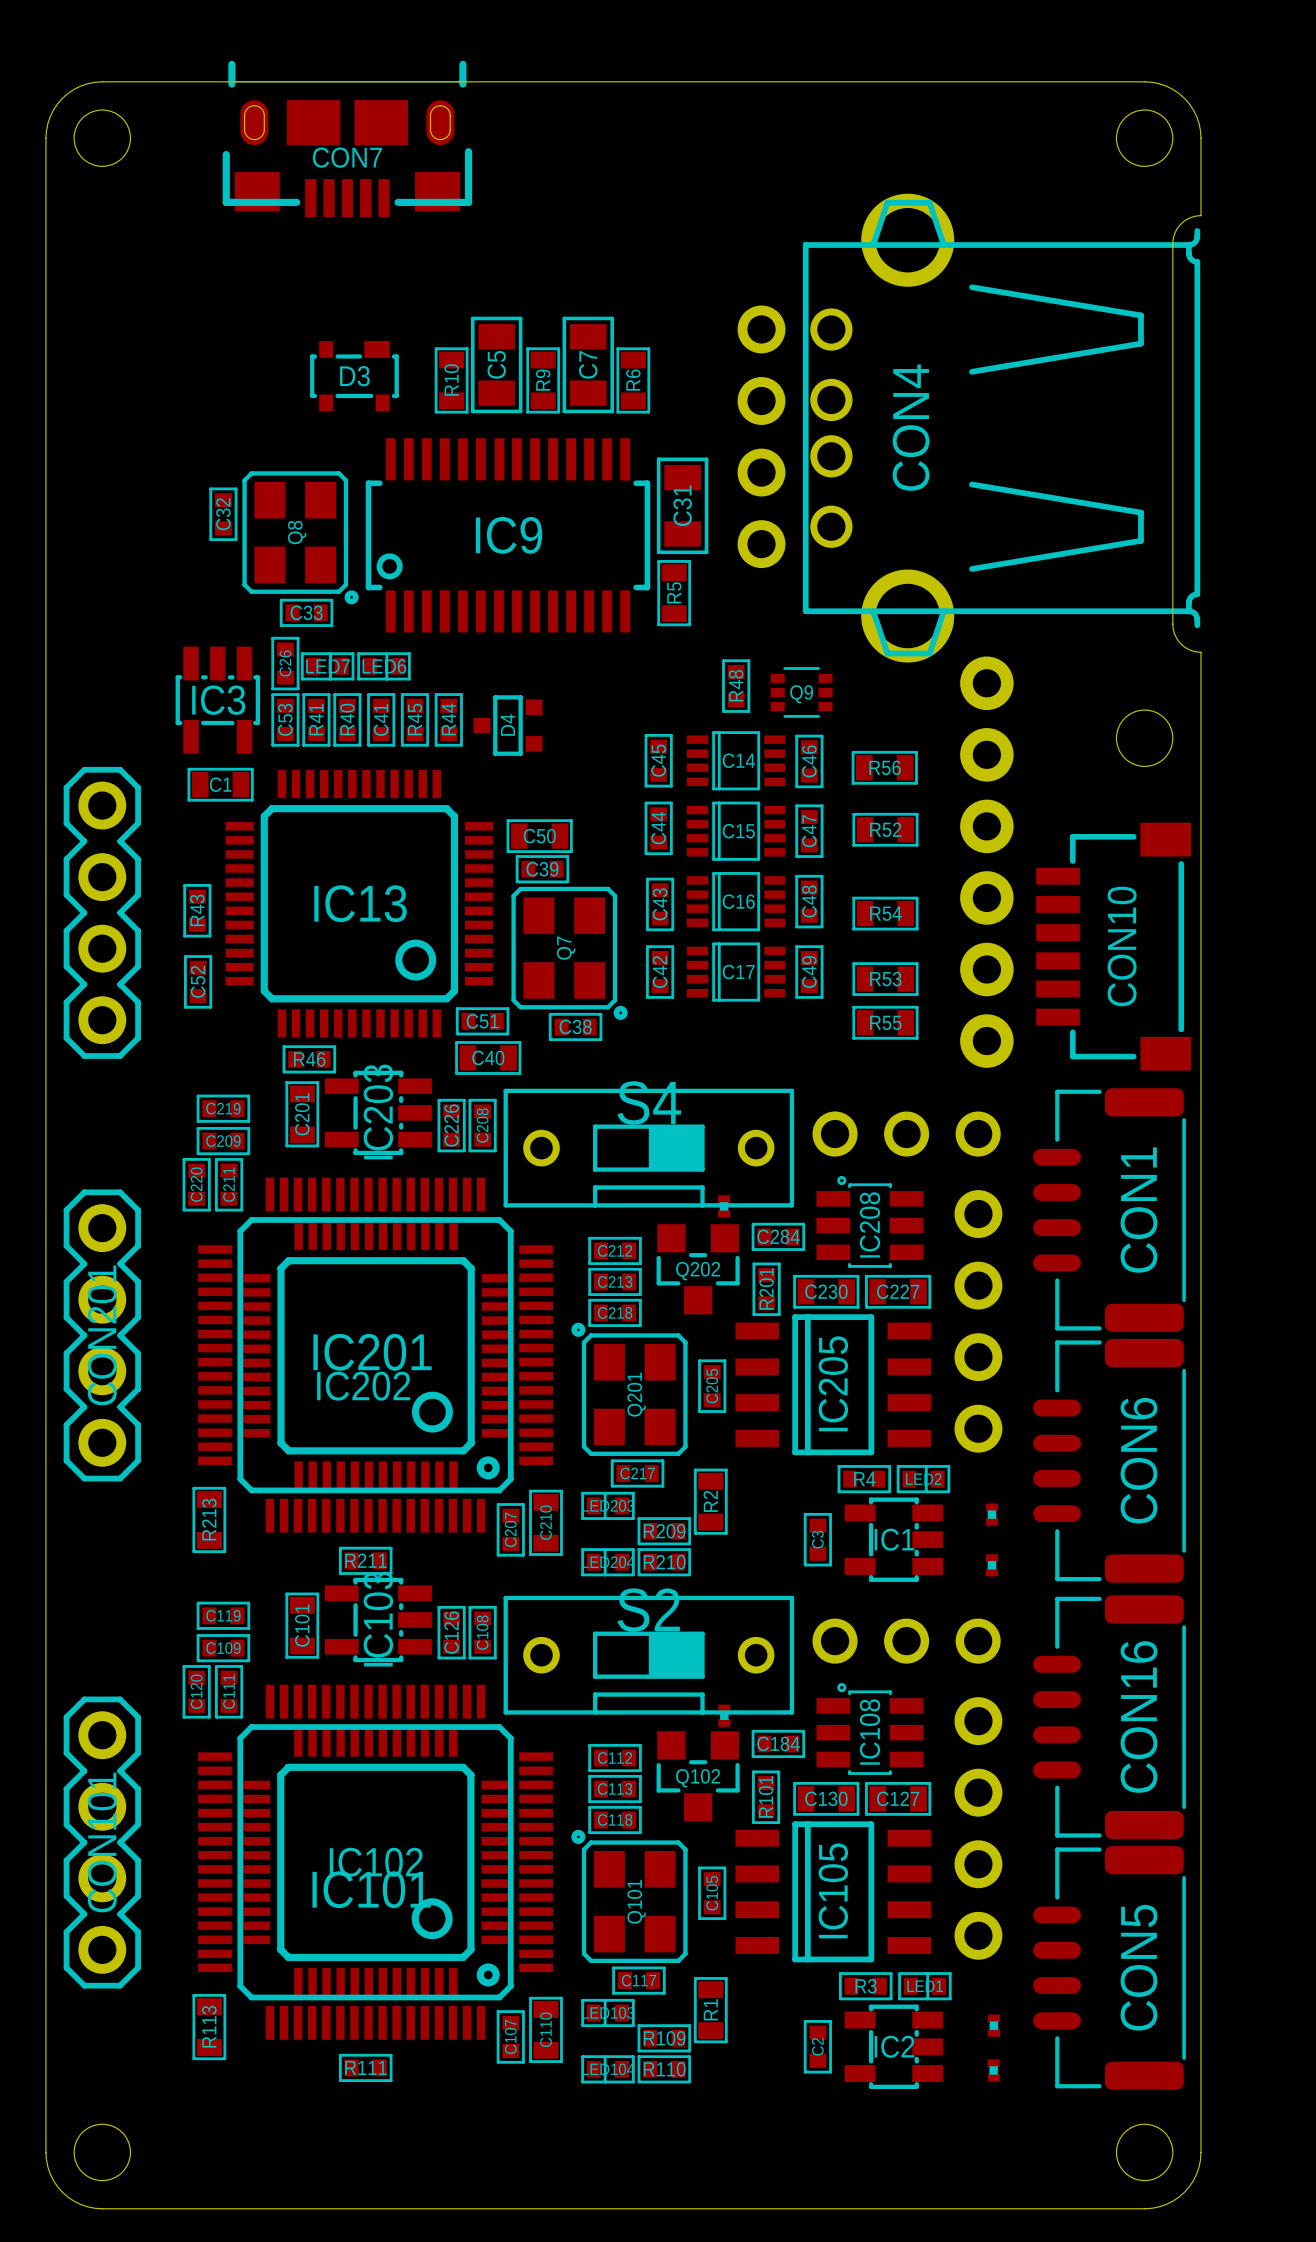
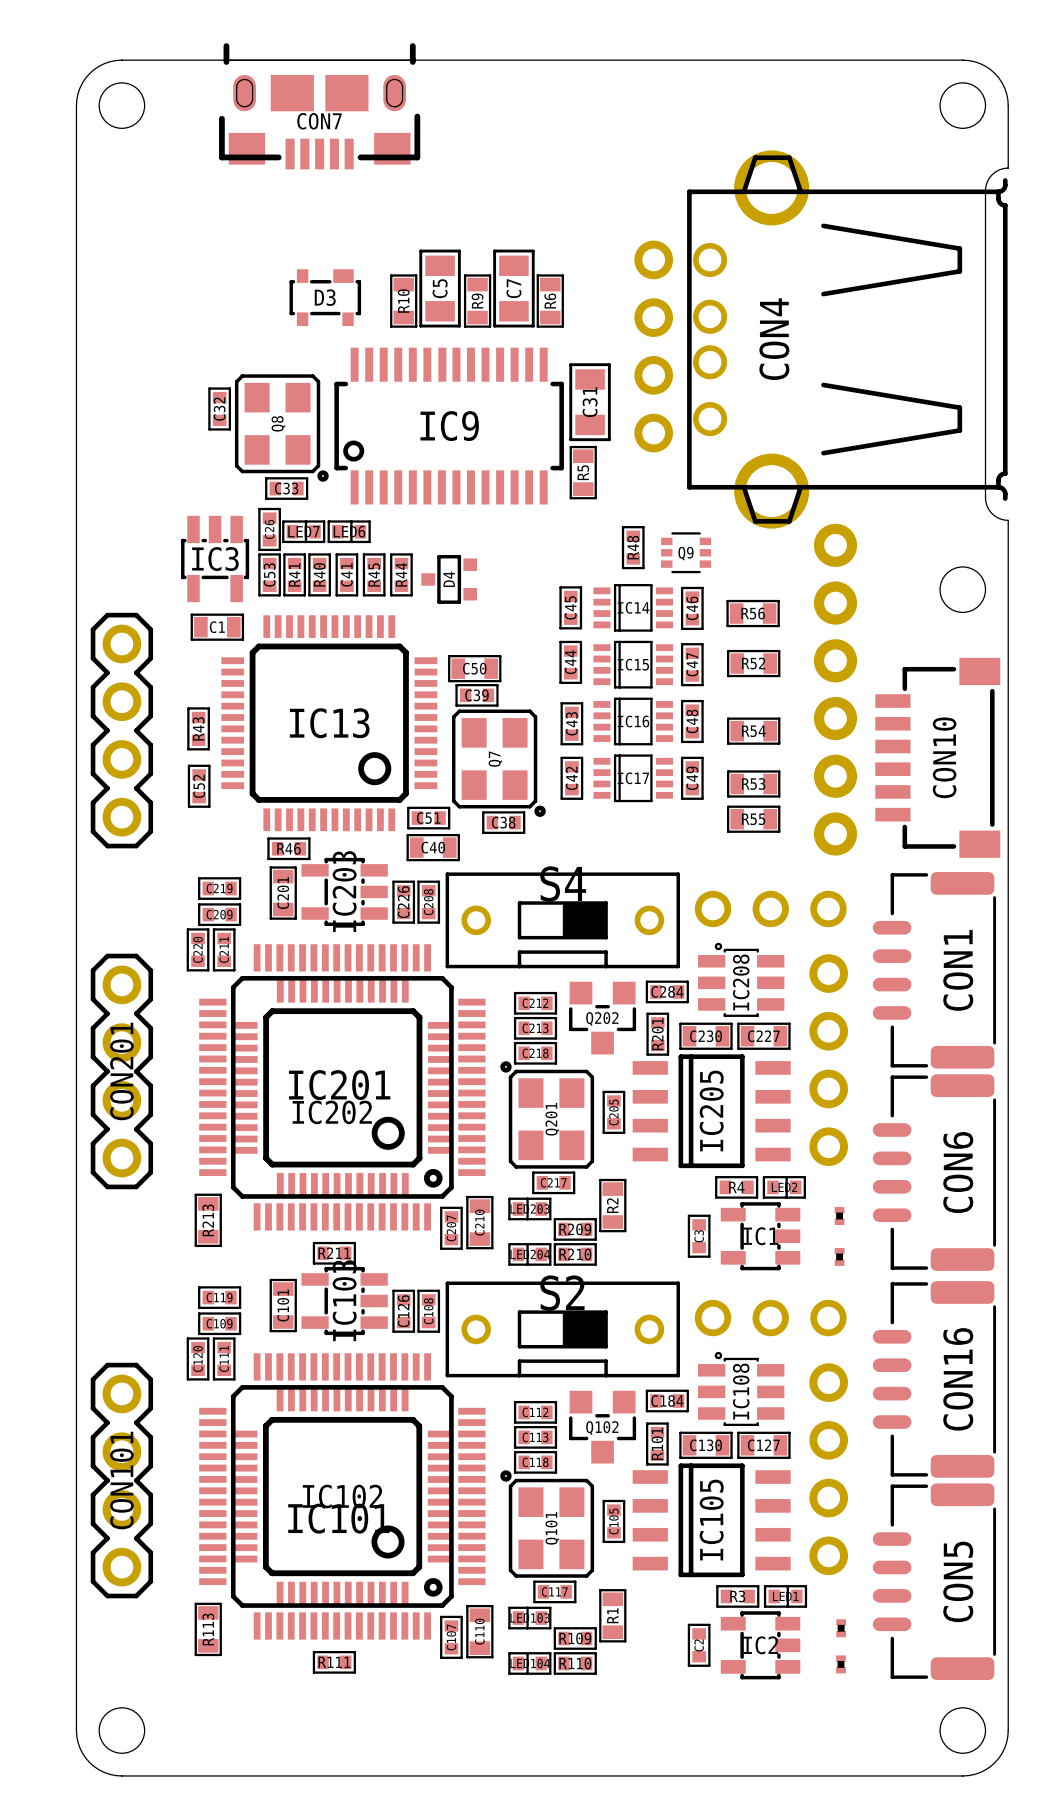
part: (724, 1206) -> none
part: (724, 1715) -> none

